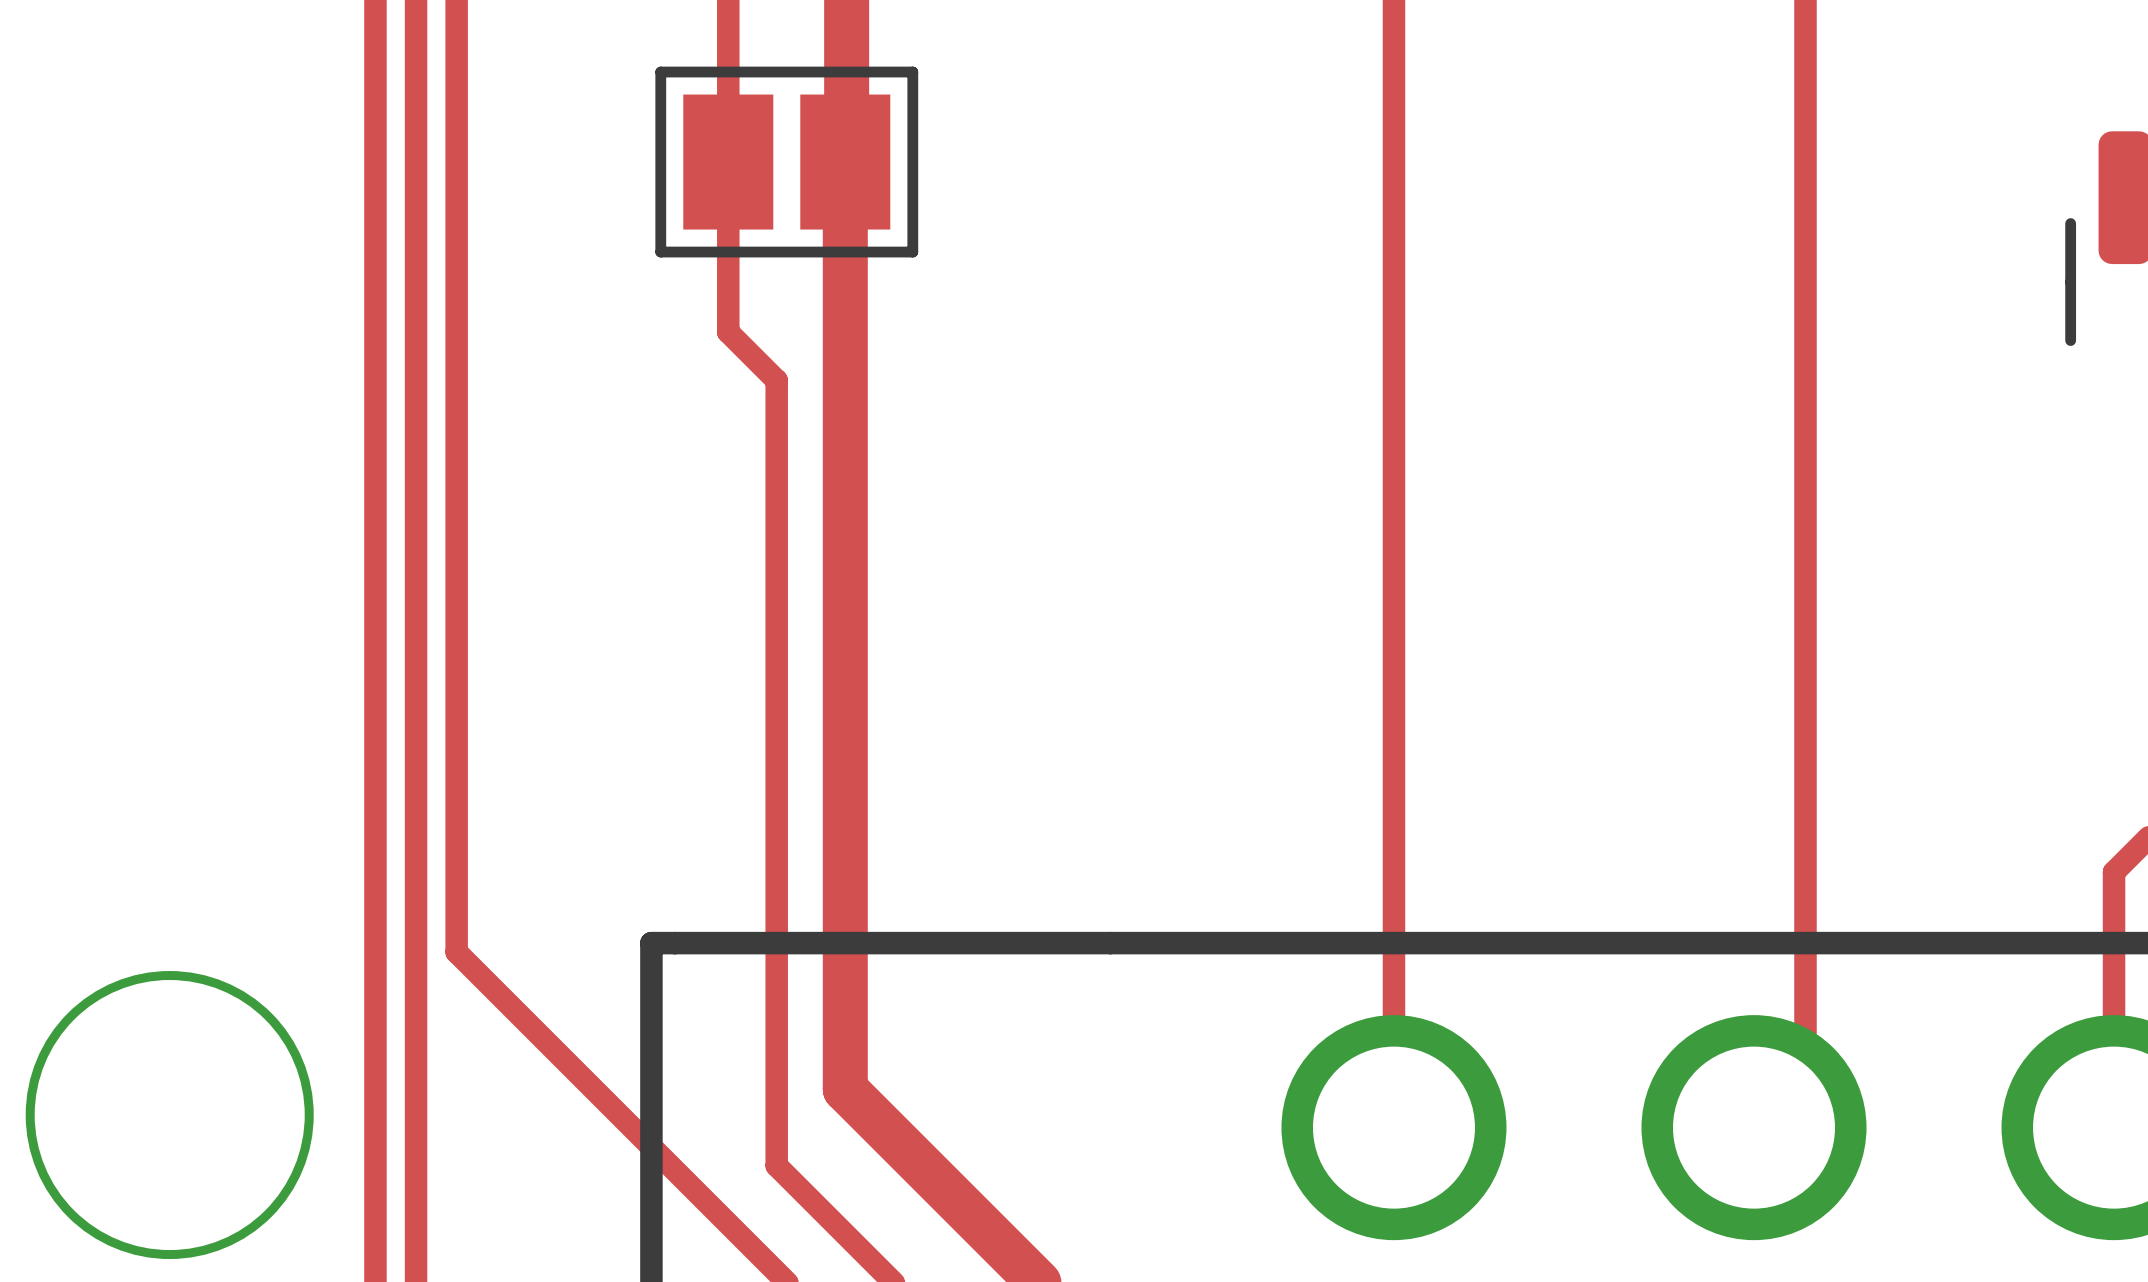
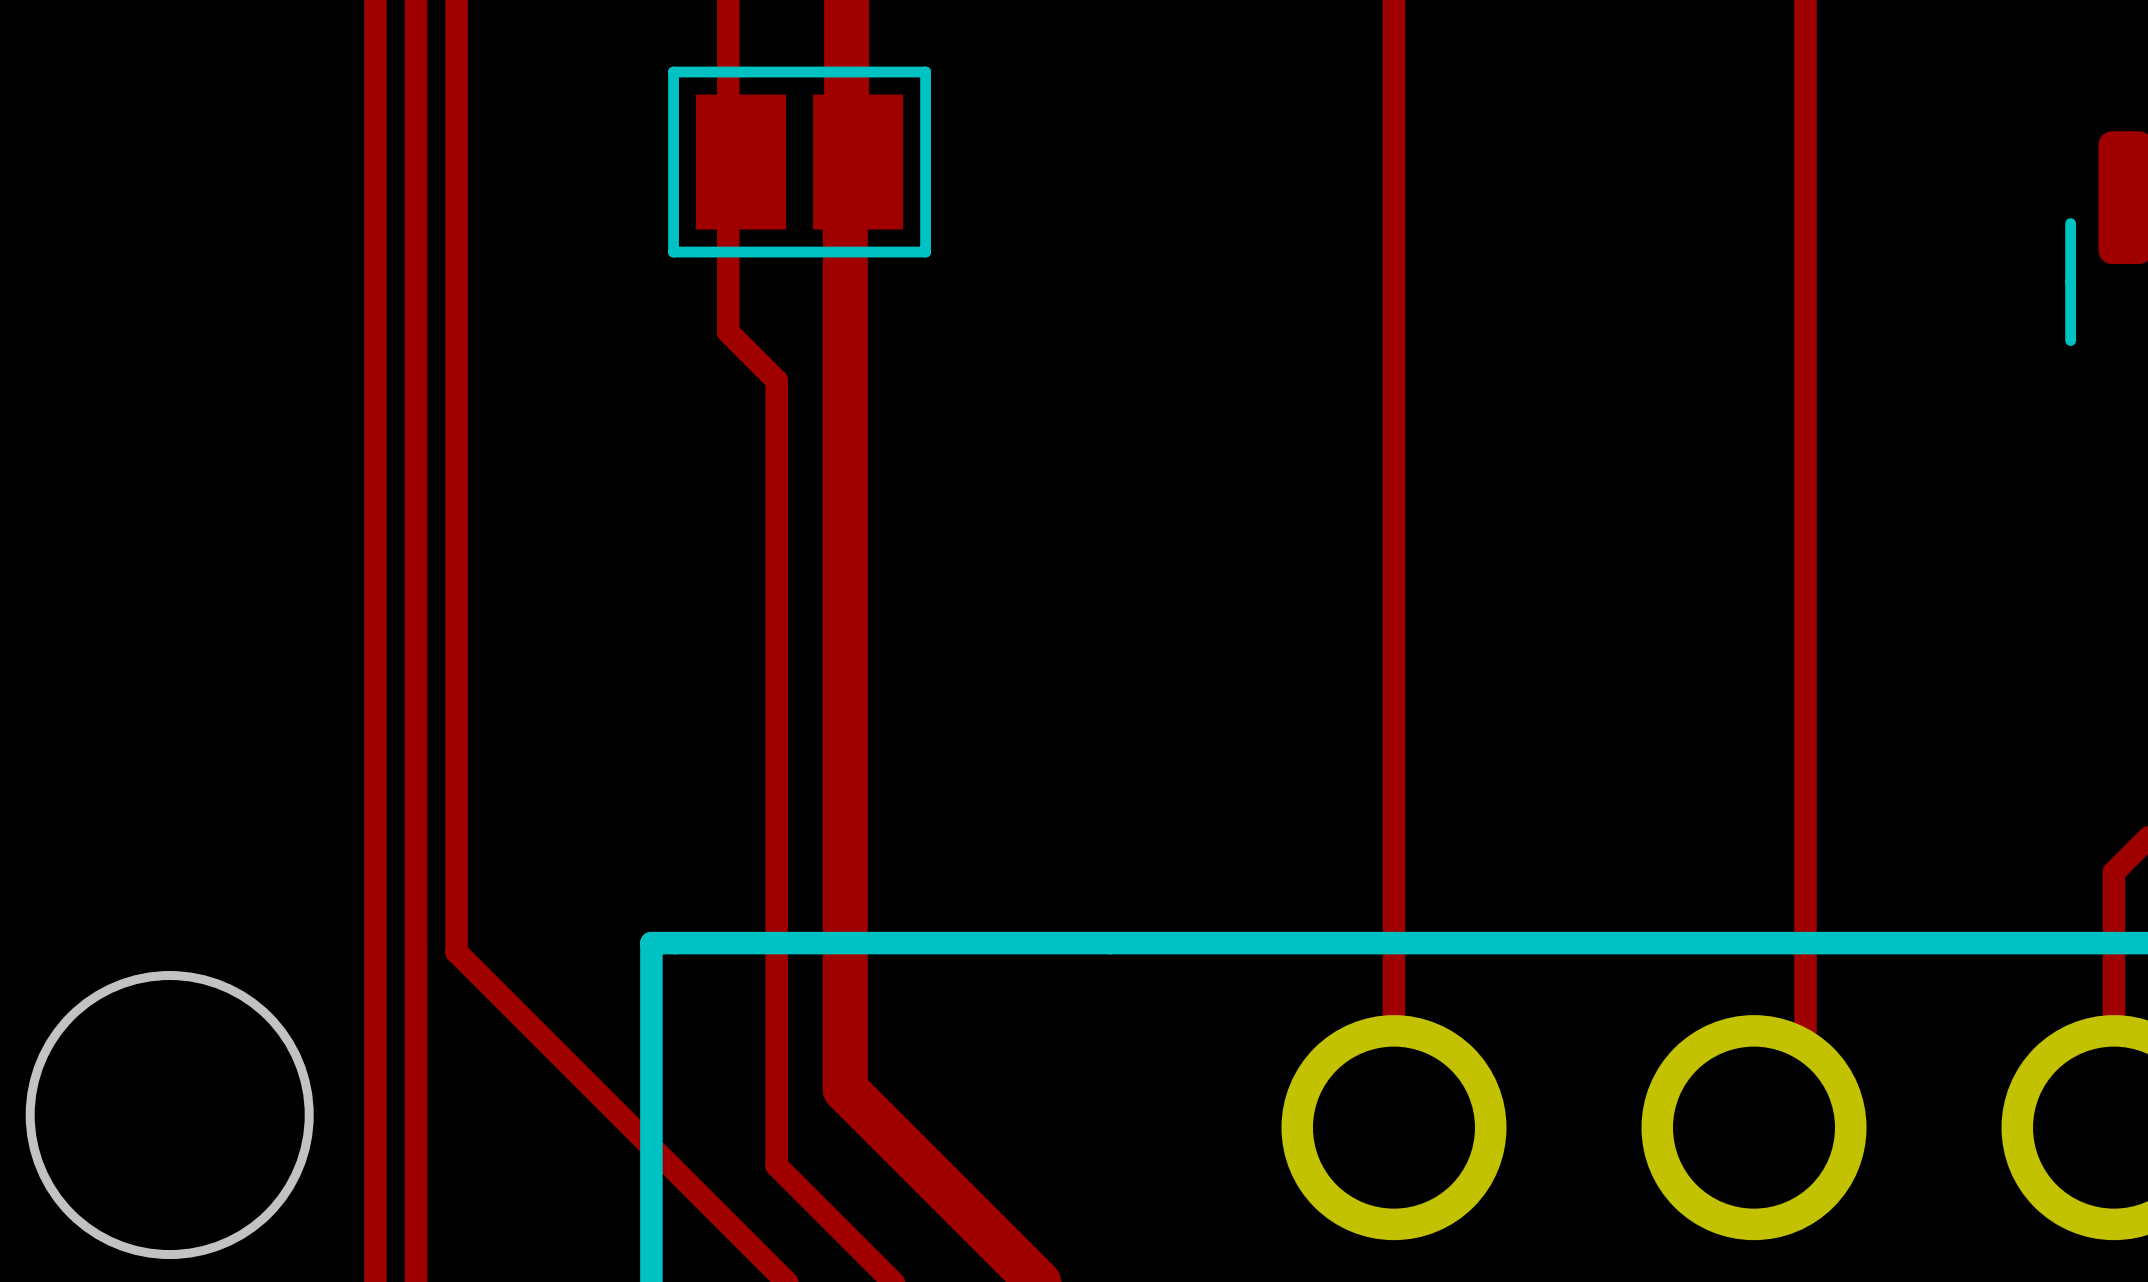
part position: (786, 162) -> (799, 162)

